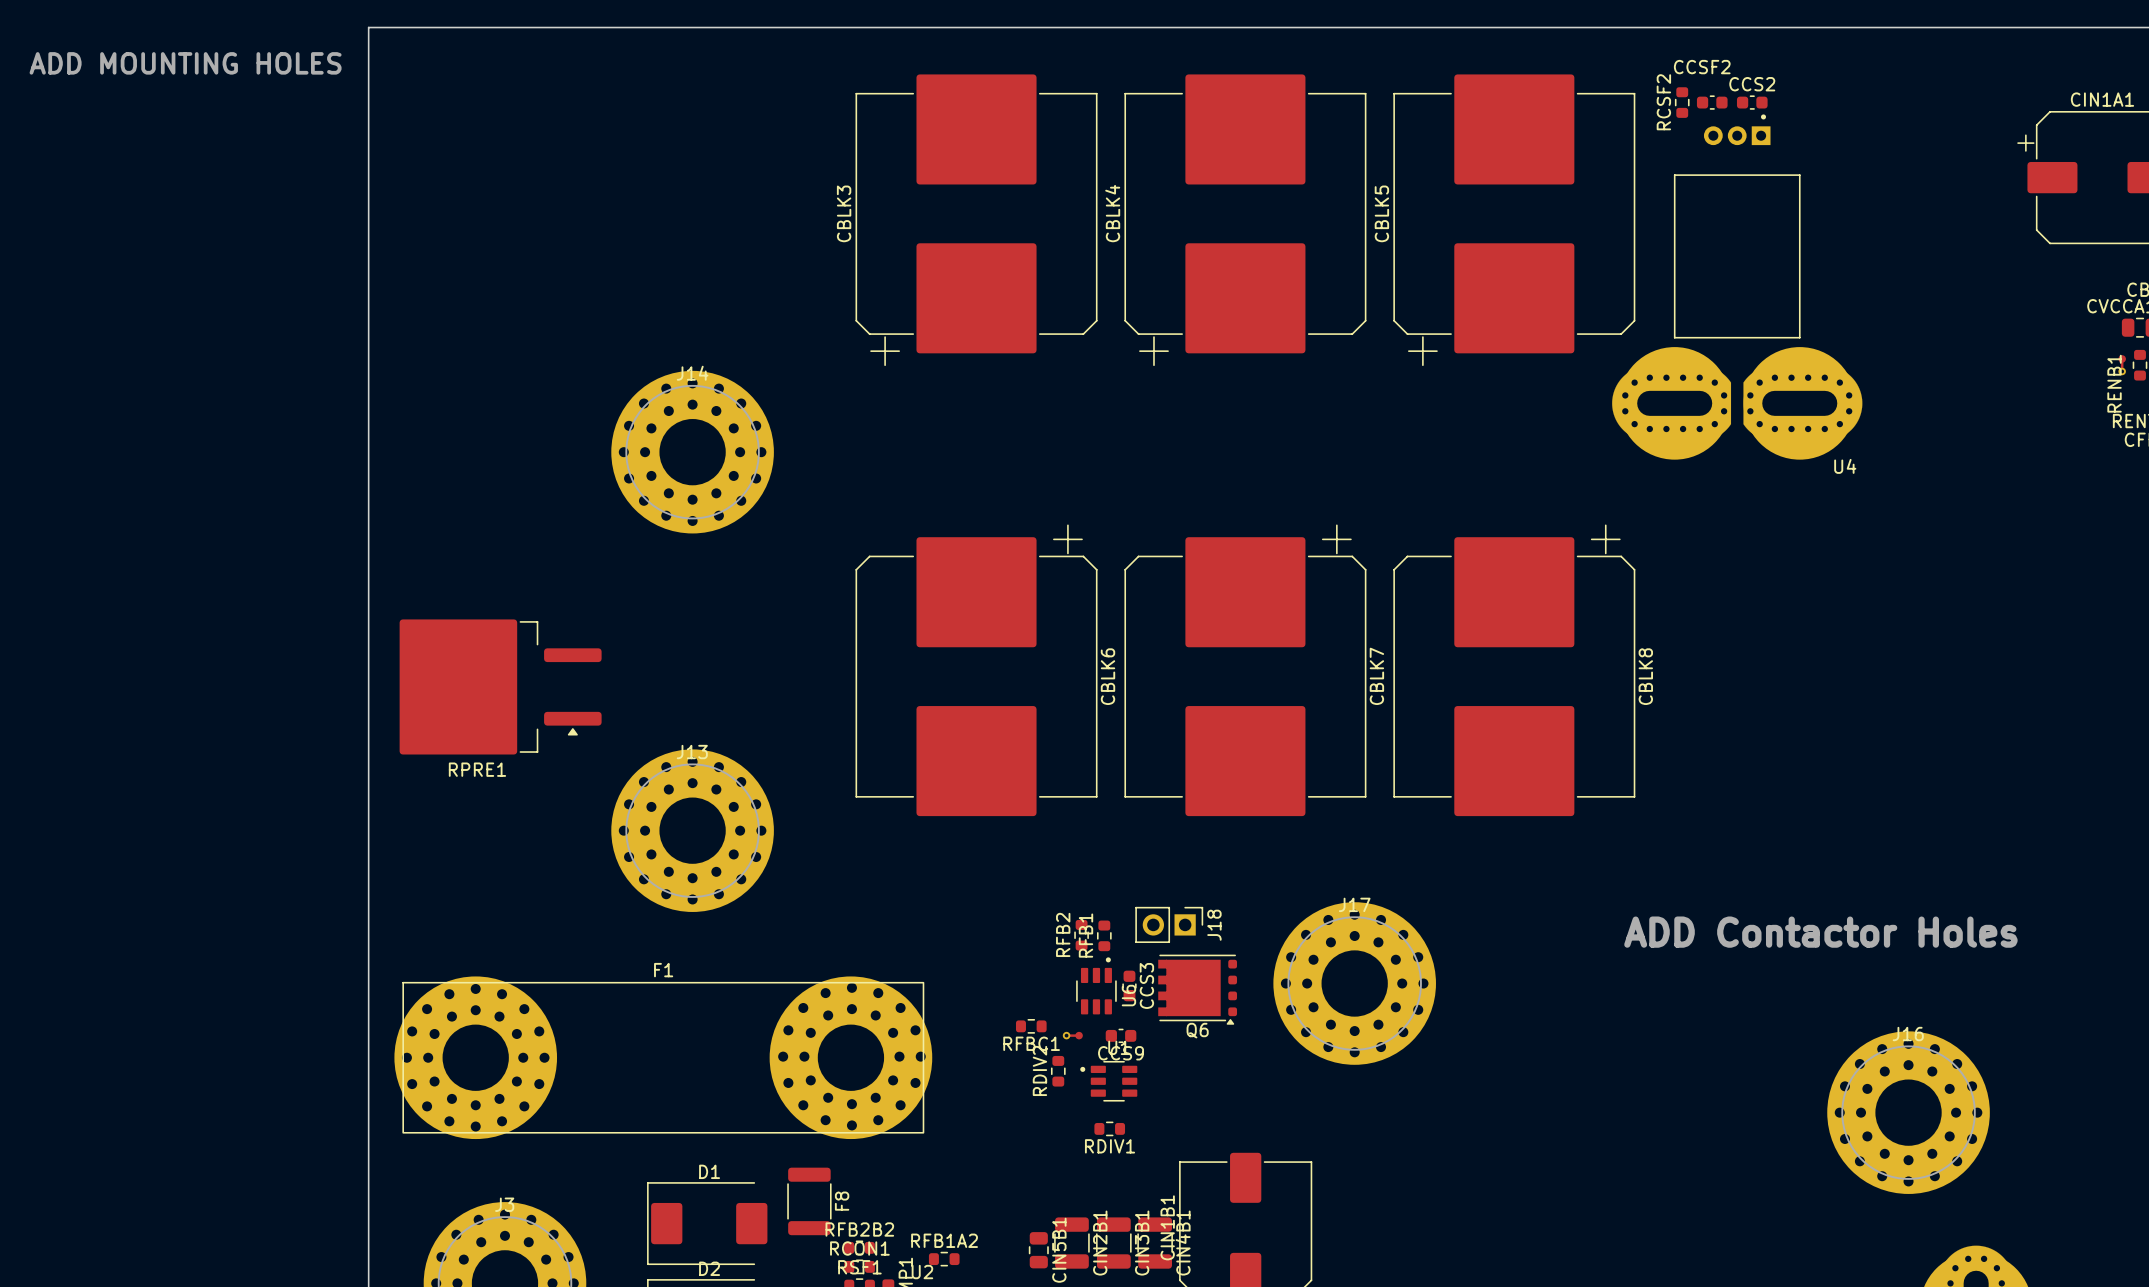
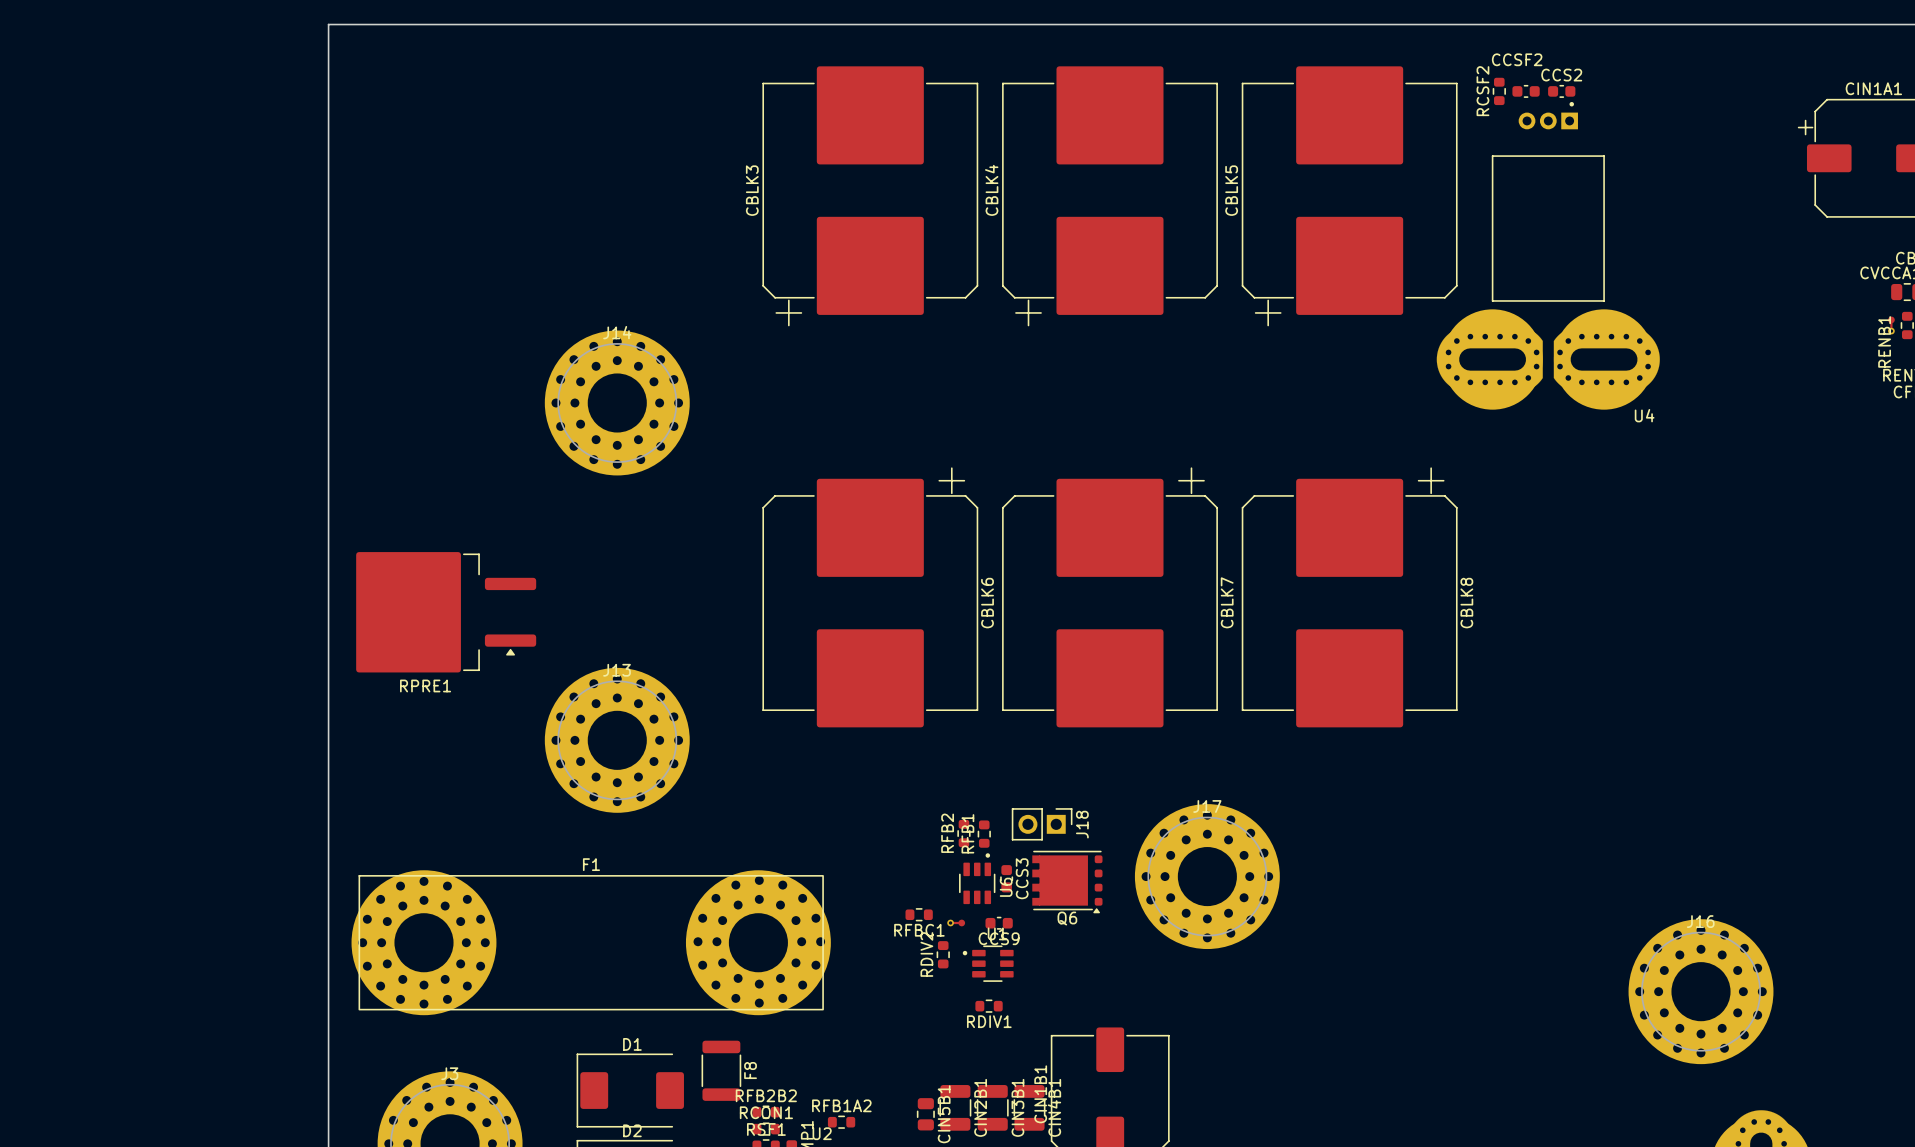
text: ADD MOUNTING HOLES (185, 63) -> none
text: ADD Contactor Holes (1820, 932) -> none

